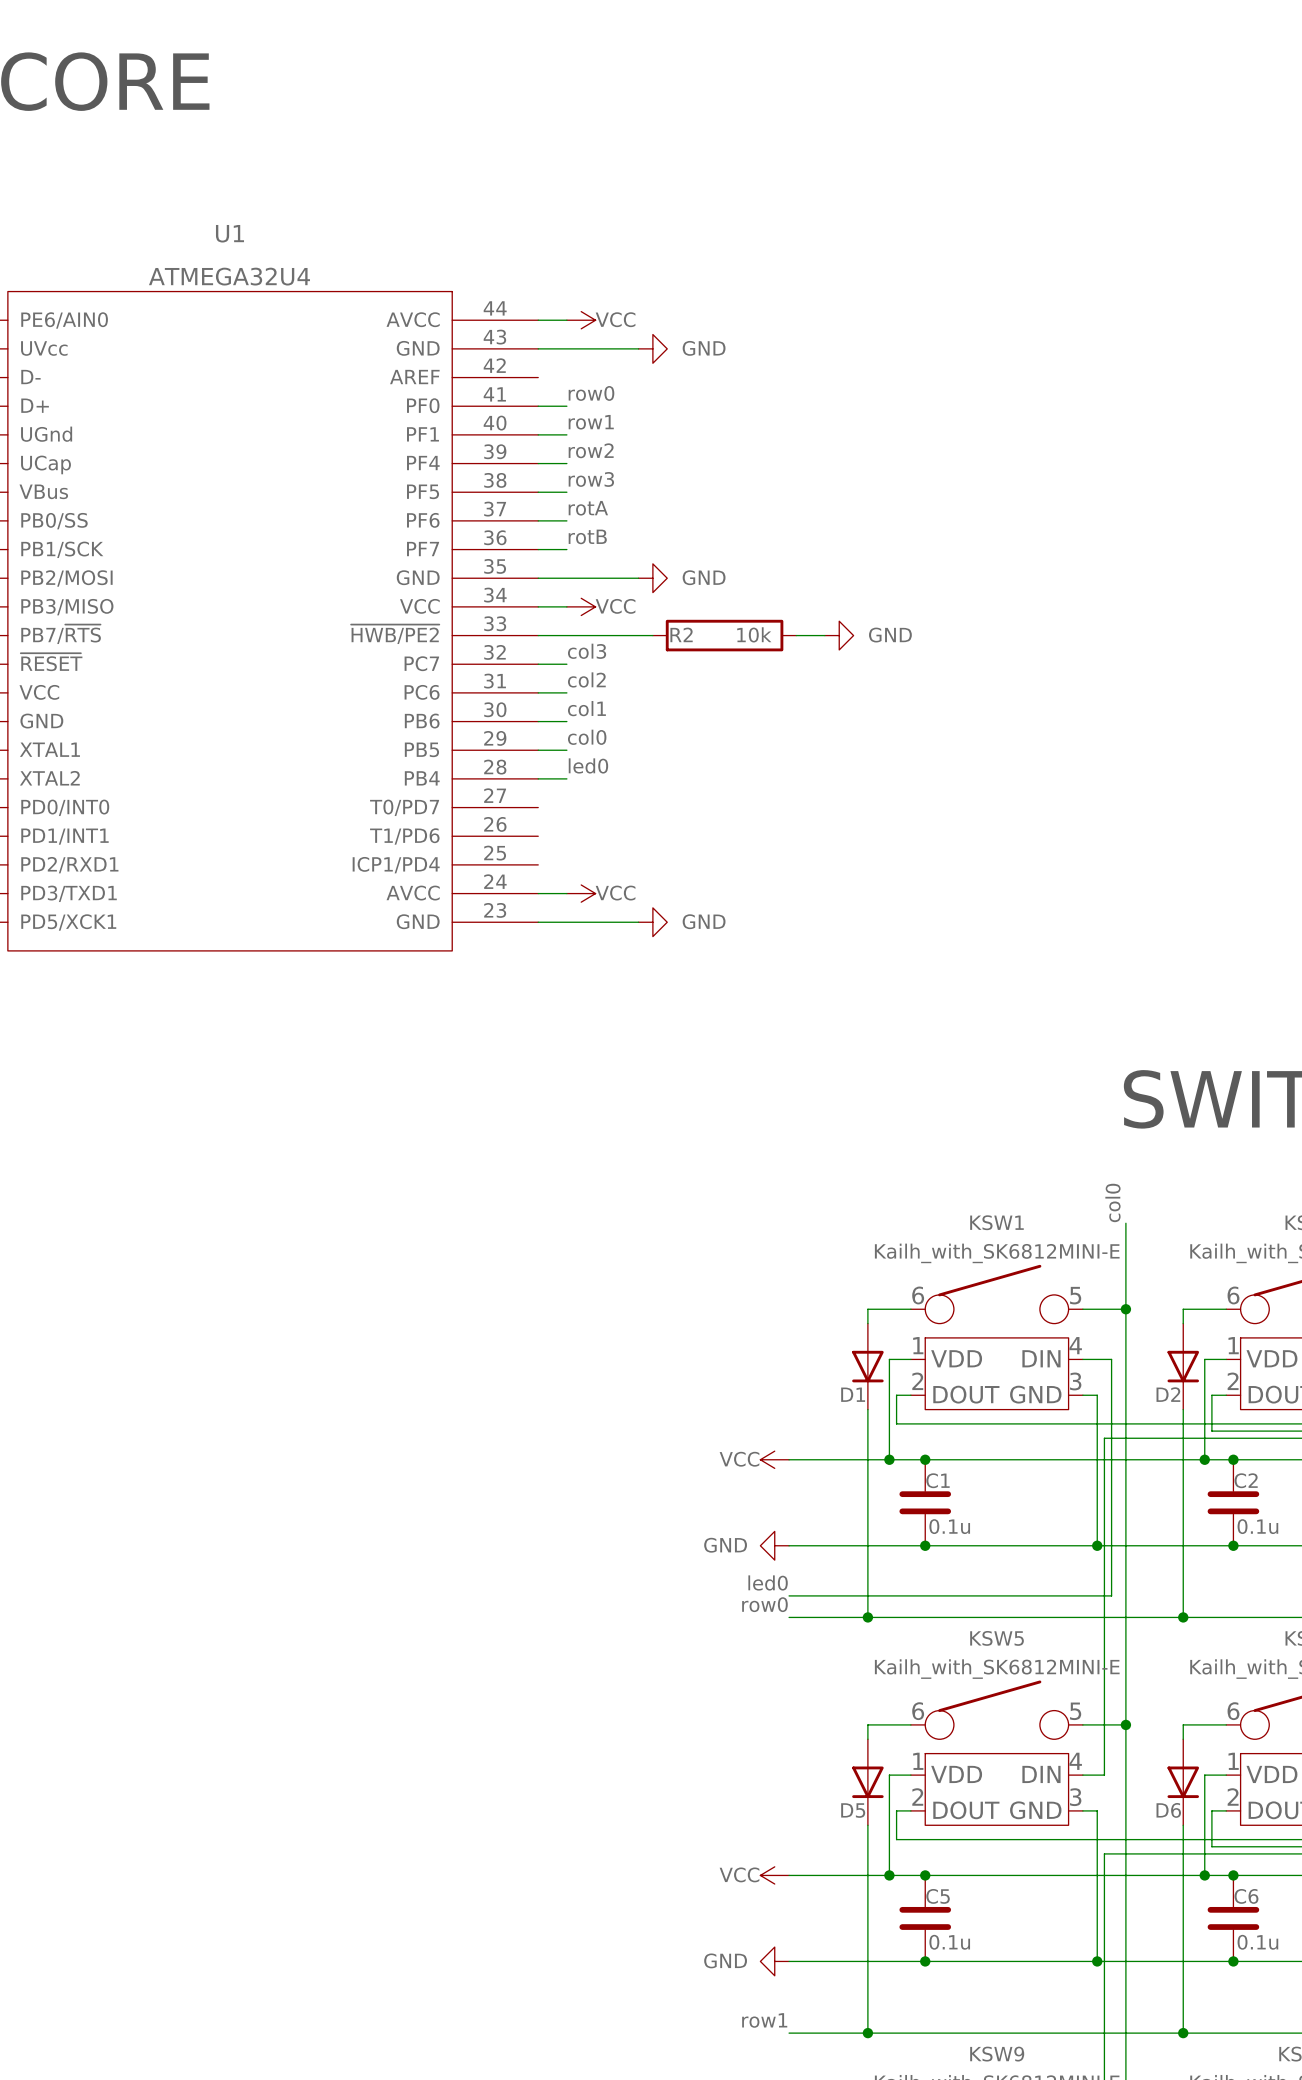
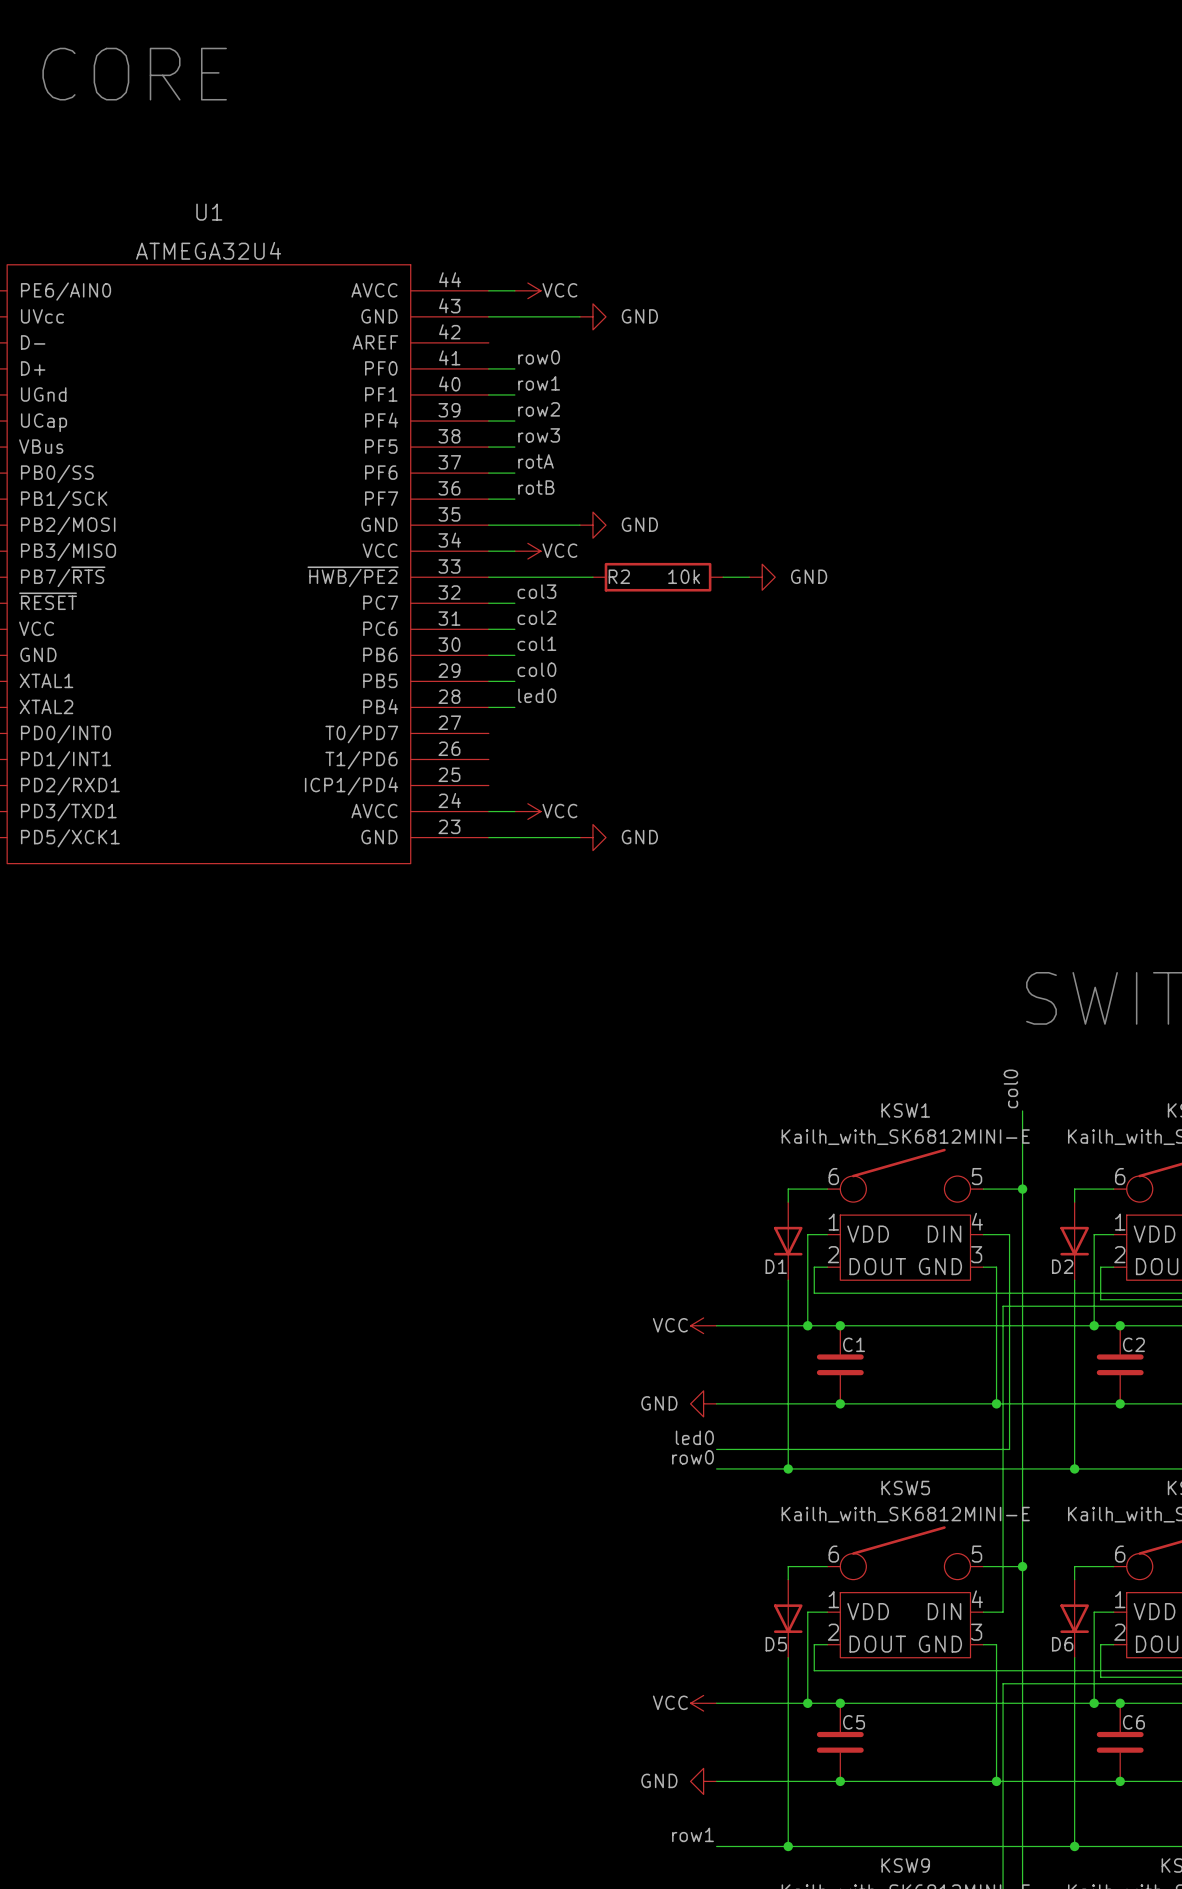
C1 value: 0.1u (949, 1526) -> none
C2 value: 0.1u (1257, 1526) -> none
C5 value: 0.1u (949, 1942) -> none
C6 value: 0.1u (1257, 1942) -> none

